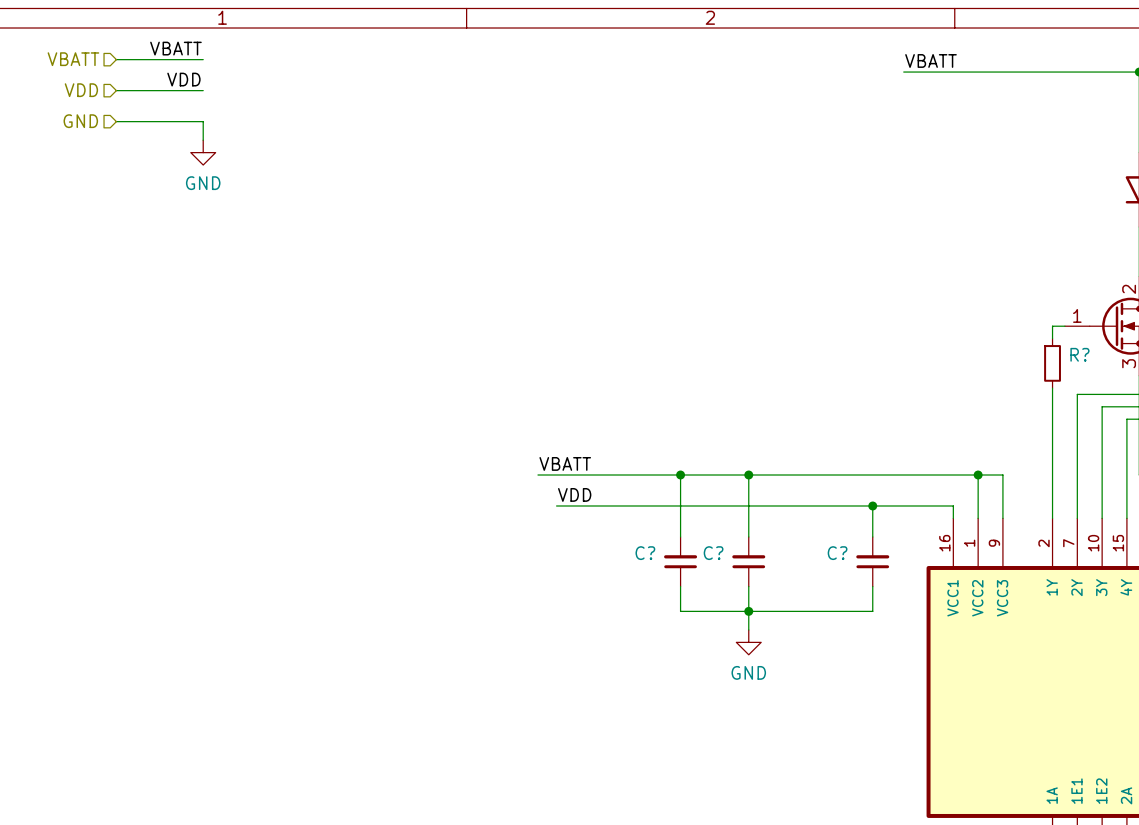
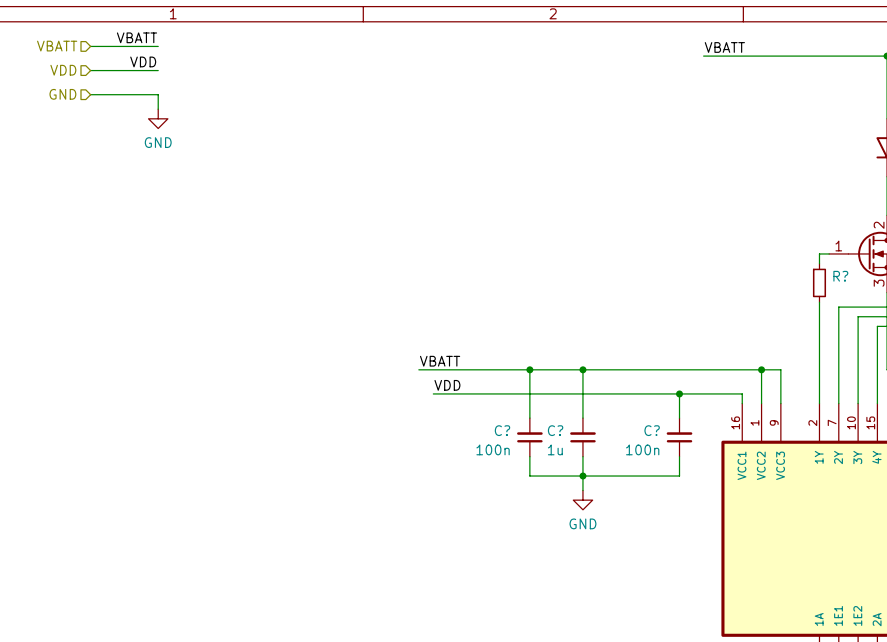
C? value: none -> 100n (493, 449)
C? value: none -> 1u (555, 449)
C? value: none -> 100n (642, 449)

